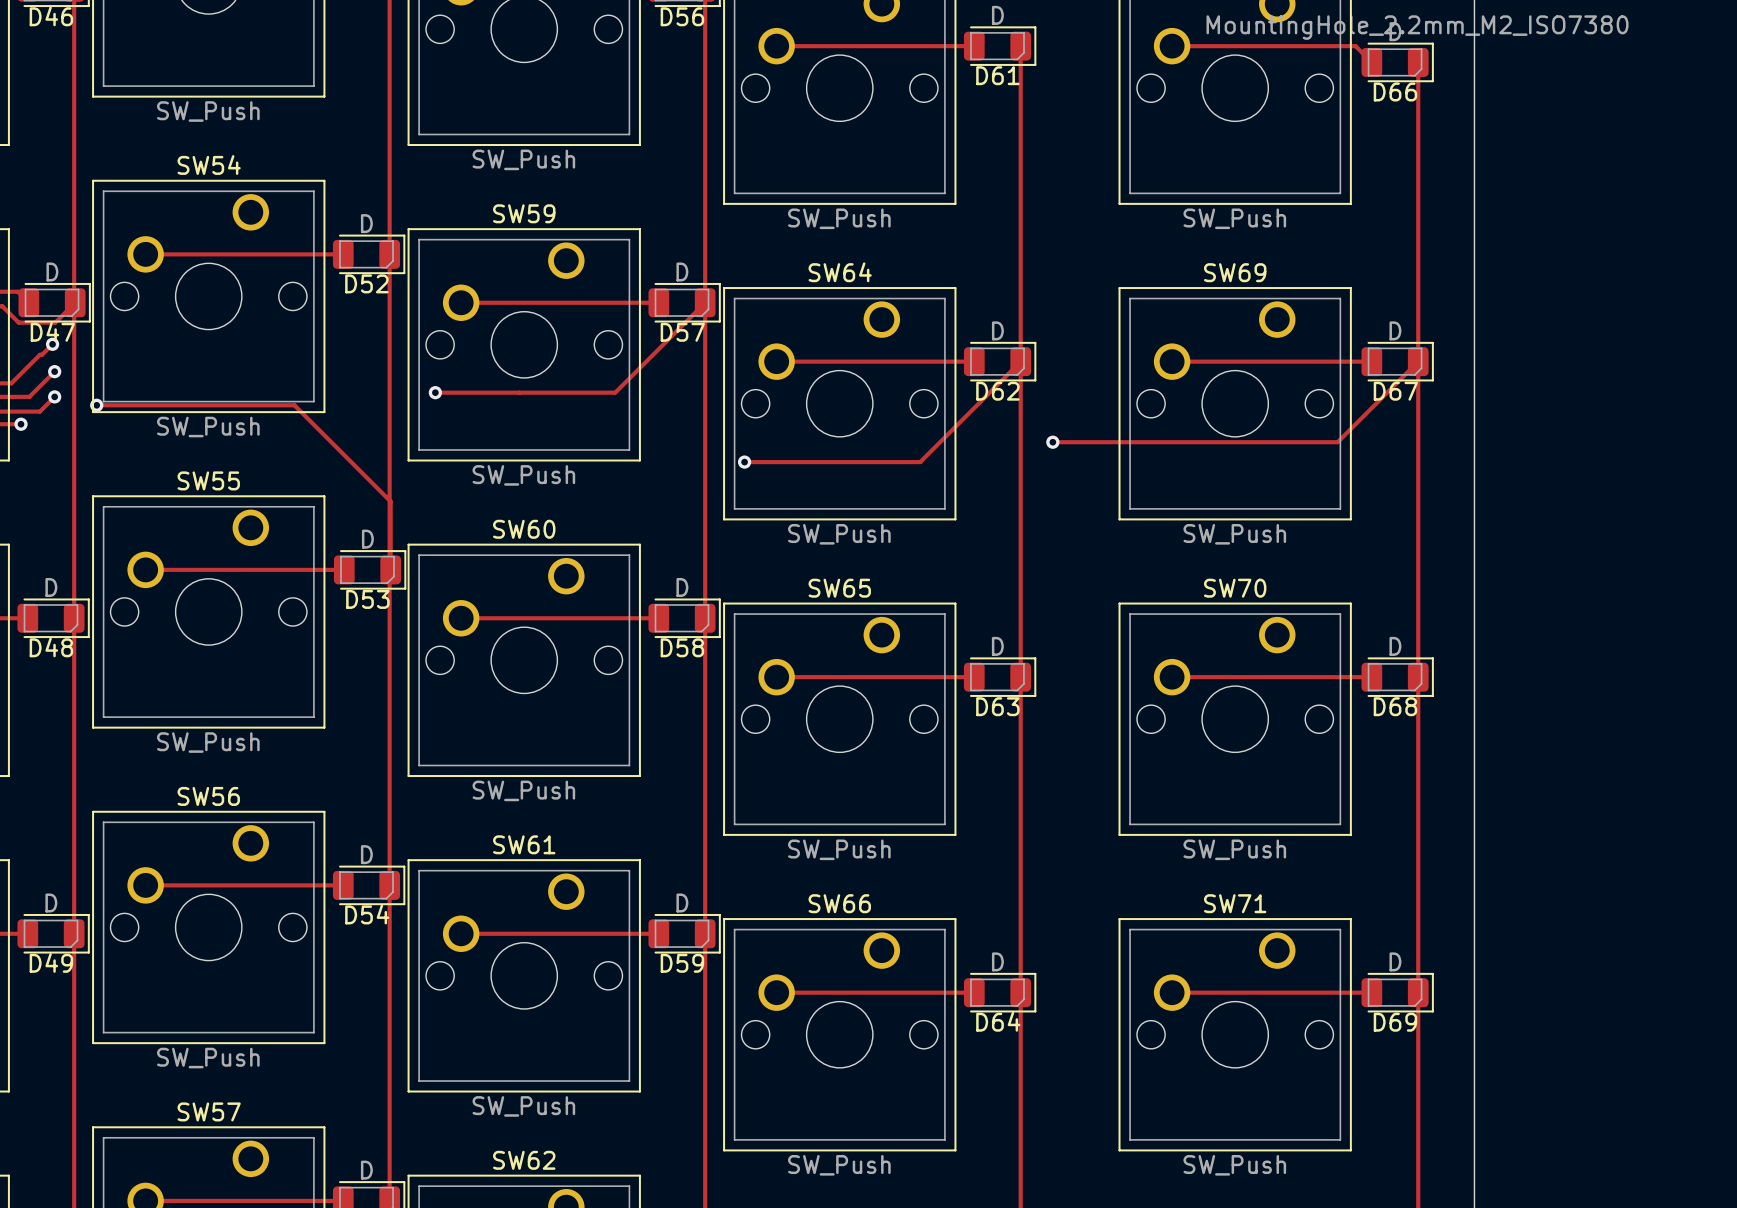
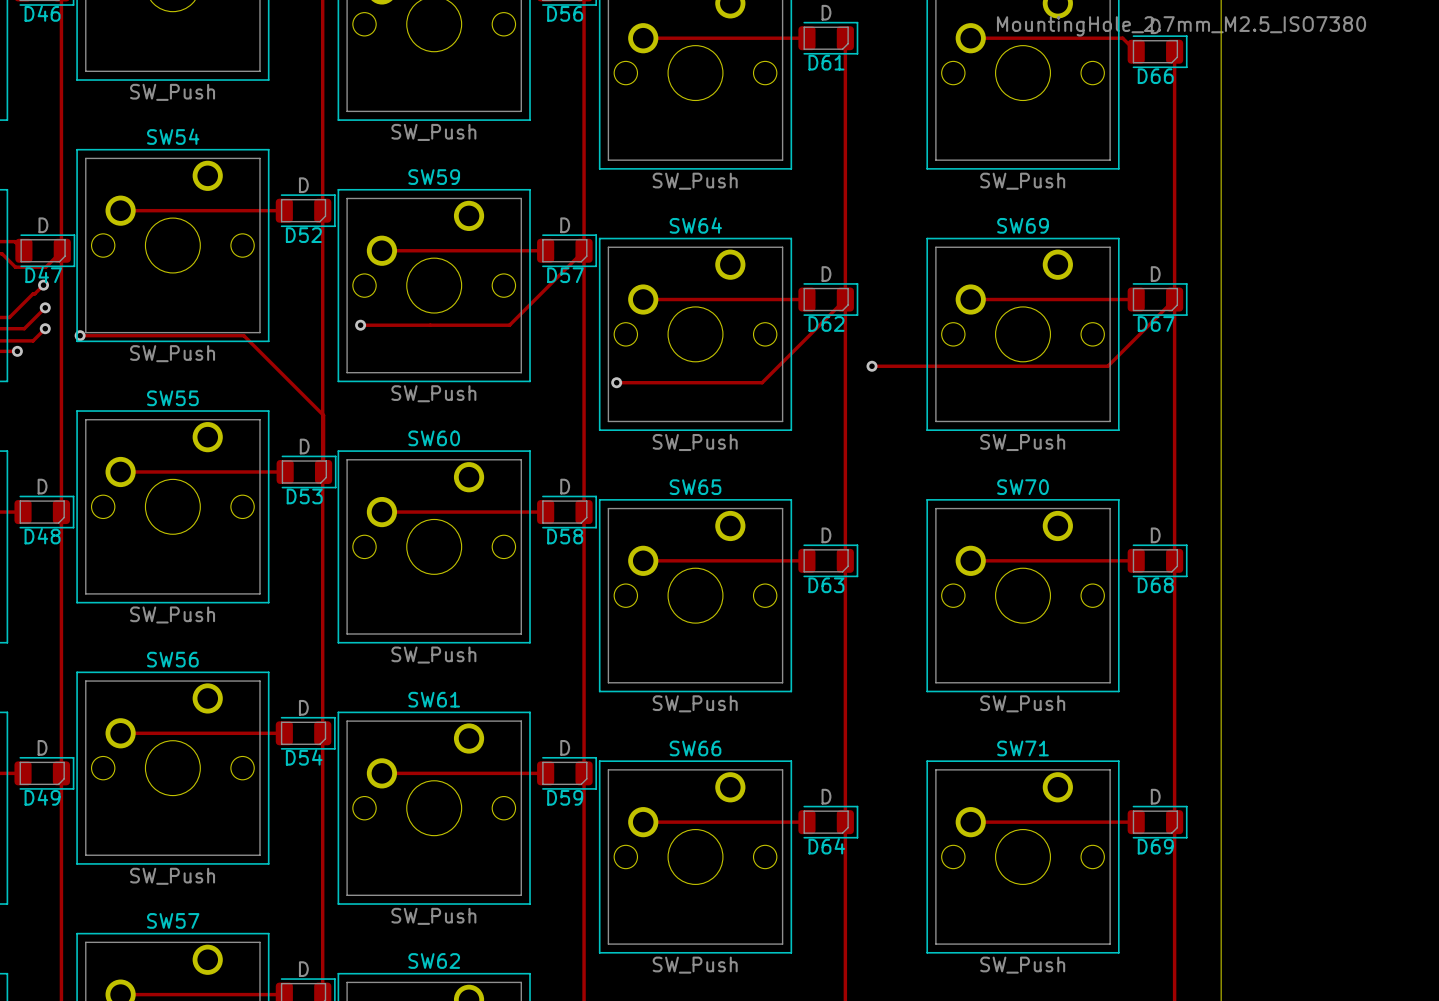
part value: MountingHole_2.2mm_M2_ISO7380 (1417, 27) -> MountingHole_2.7mm_M2.5_ISO7380 (1181, 26)

